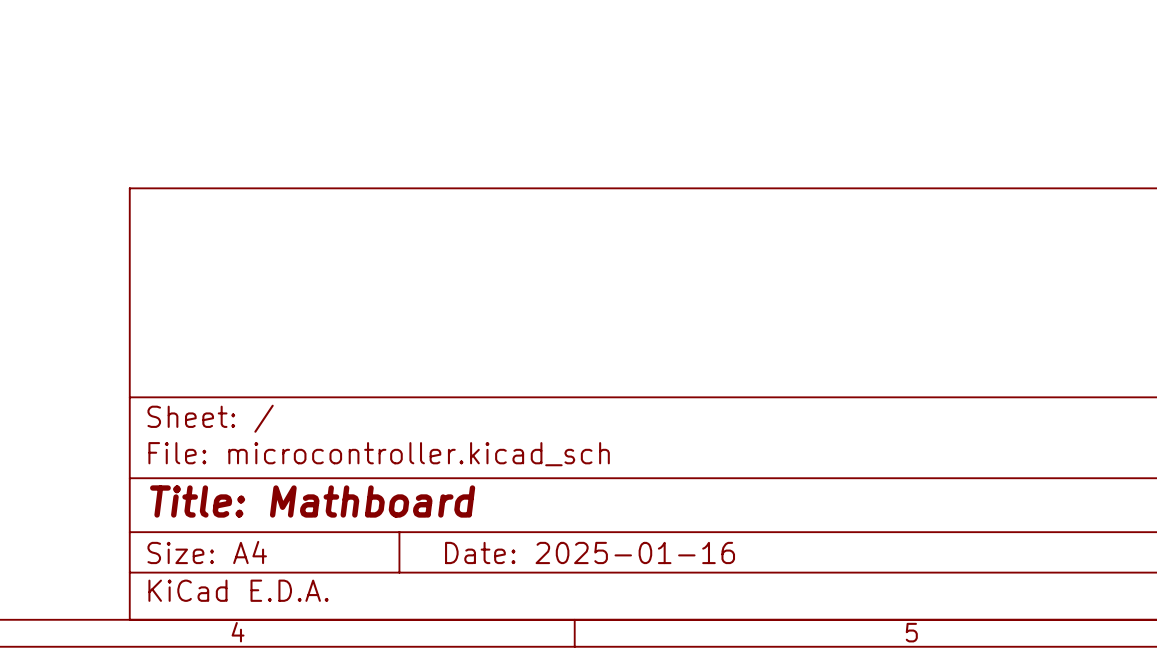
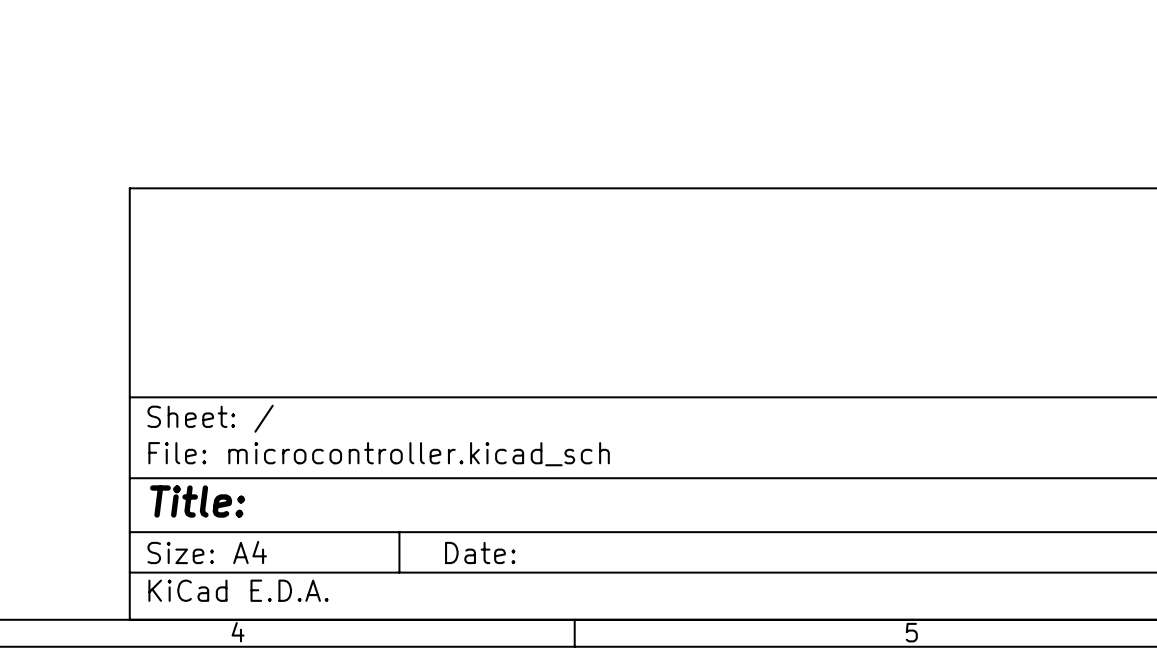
title block: Title: Mathboard (312, 501) -> Title: (197, 501)
title block: Date: 2025-01-16 (590, 552) -> Date: (480, 552)

